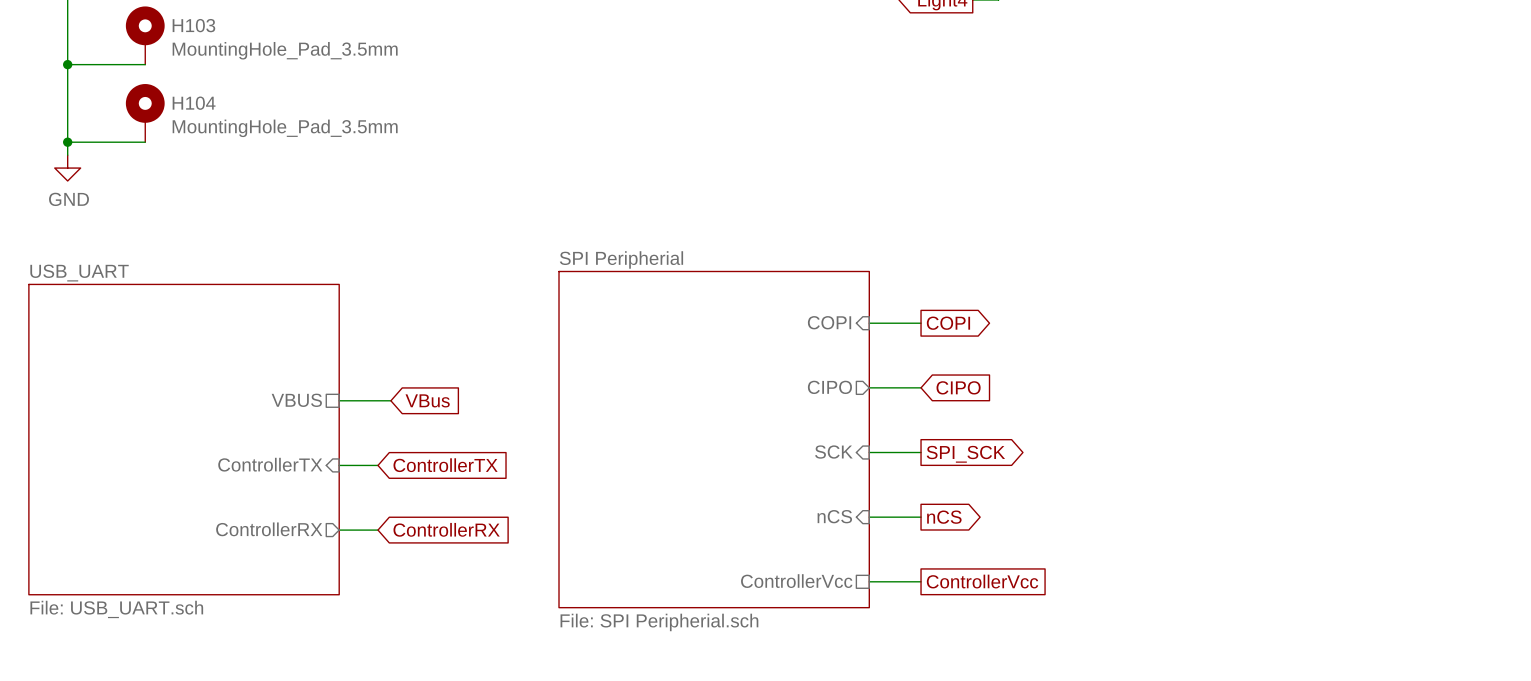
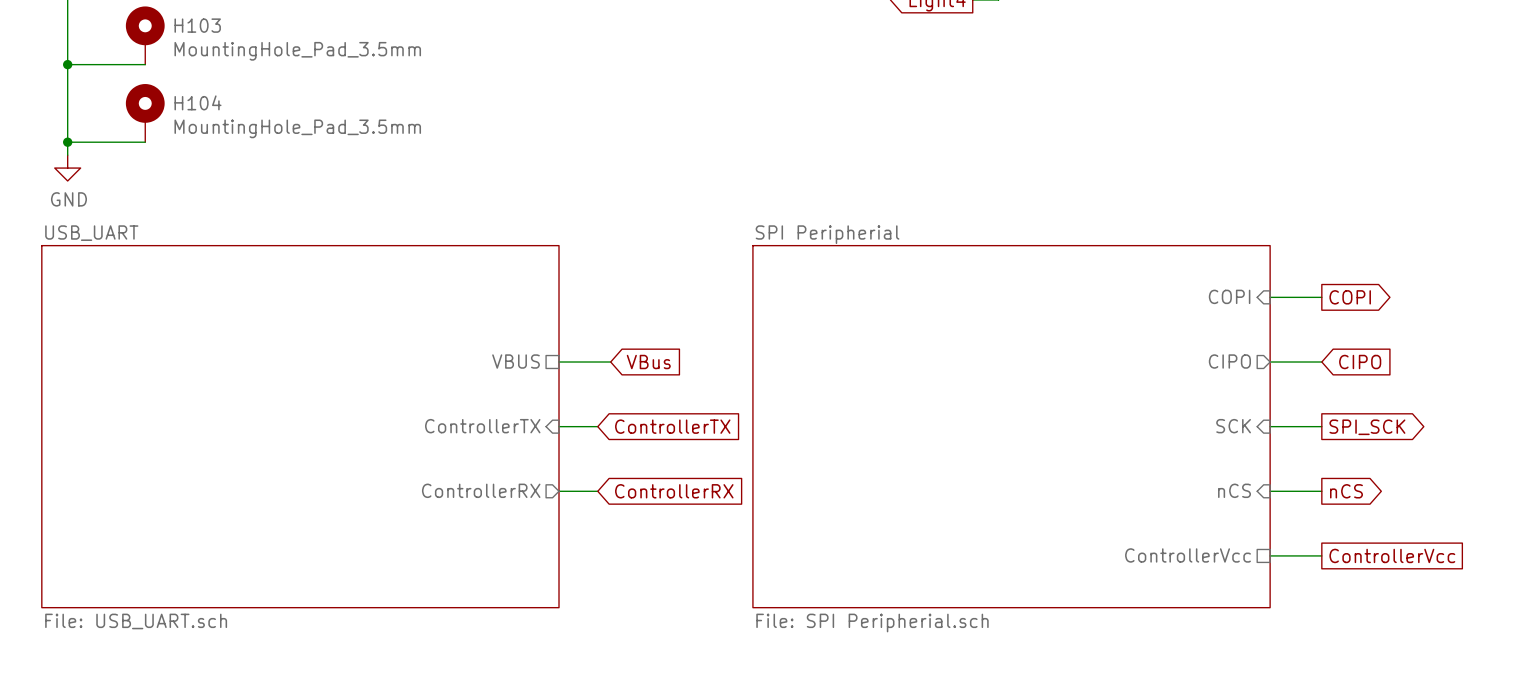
sheet pin: none -> COPI (1229, 296)
wire: none -> (1270, 297) (1321, 297)
global label: none -> COPI (1350, 297)
sheet pin: COPI (829, 322) -> none
wire: (869, 323) (921, 323) -> none
global label: COPI (948, 323) -> none
sheet pin: none -> CIPO (1229, 361)
wire: none -> (1270, 362) (1321, 362)
global label: none -> CIPO (1360, 362)
sheet pin: CIPO (829, 387) -> none
wire: (869, 387) (921, 387) -> none
global label: CIPO (958, 387) -> none
sheet pin position: VBUS (296, 400) -> VBUS (516, 361)
wire: (339, 400) (390, 400) -> (559, 362) (610, 362)
global label position: VBus (427, 400) -> VBus (648, 362)
sheet USB_UART: none -> File: USB_UART.sch (300, 426)
sheet SPI Peripherial: none -> File: SPI Peripherial.sch (1011, 426)
sheet pin: none -> SCK (1233, 426)
wire: none -> (1270, 426) (1321, 426)
global label: none -> SPI_SCK (1367, 427)
sheet USB_UART: File: USB_UART.sch (184, 439) -> none
sheet SPI Peripherial: File: SPI Peripherial.sch (714, 439) -> none
sheet pin: SCK (833, 452) -> none
wire: (869, 452) (921, 452) -> none
global label: SPI_SCK (965, 454) -> none
sheet pin position: ControllerTX (270, 464) -> ControllerTX (482, 426)
wire: (339, 465) (377, 465) -> (559, 426) (597, 426)
global label position: ControllerTX (445, 465) -> ControllerTX (672, 426)
sheet pin: none -> nCS (1234, 490)
wire: none -> (1270, 491) (1321, 491)
global label: none -> nCS (1346, 491)
sheet pin: nCS (834, 516) -> none
wire: (869, 517) (921, 517) -> none
global label: nCS (944, 517) -> none
sheet pin position: ControllerRX (269, 529) -> ControllerRX (481, 490)
global label position: ControllerRX (446, 529) -> ControllerRX (674, 491)
wire: (339, 530) (377, 530) -> (559, 491) (597, 491)
sheet pin: none -> ControllerVcc (1188, 555)
wire: none -> (1270, 555) (1321, 555)
global label: none -> ControllerVcc (1392, 555)
sheet pin: ControllerVcc (796, 581) -> none
wire: (869, 581) (921, 581) -> none
global label: ControllerVcc (982, 581) -> none

